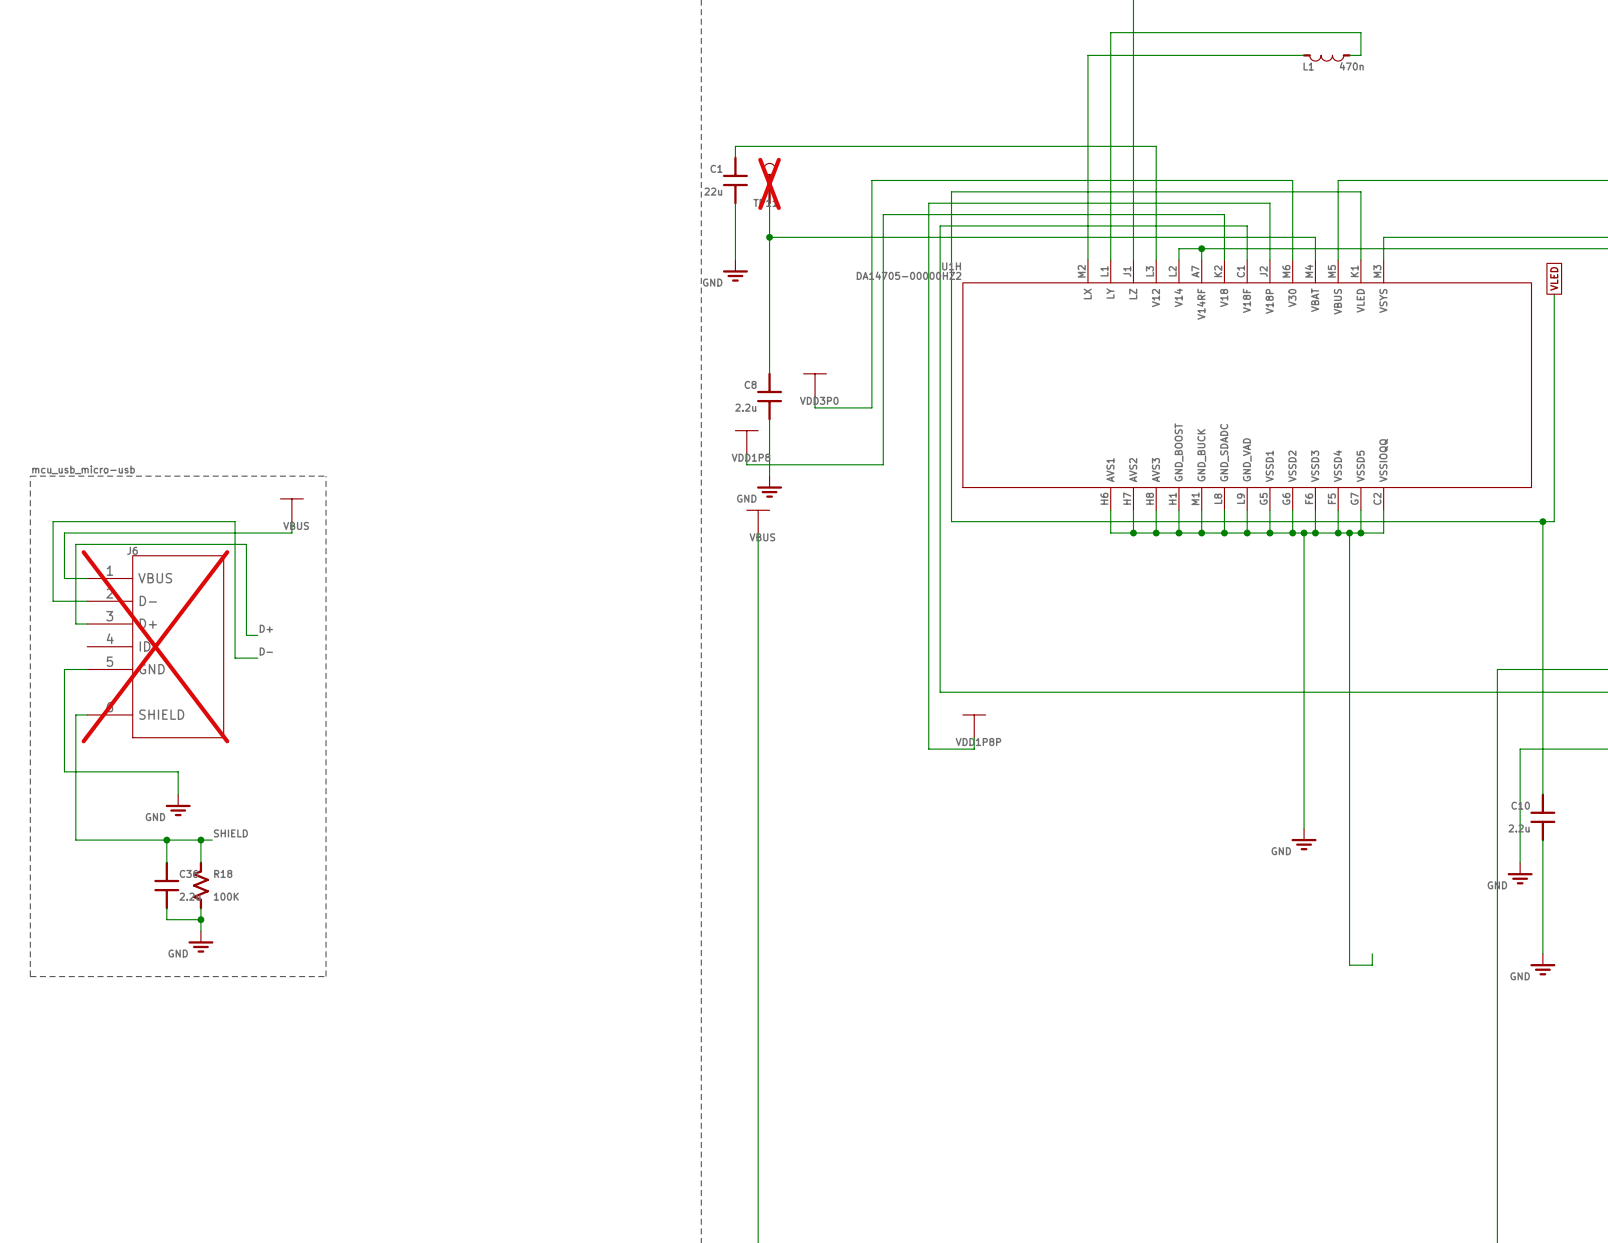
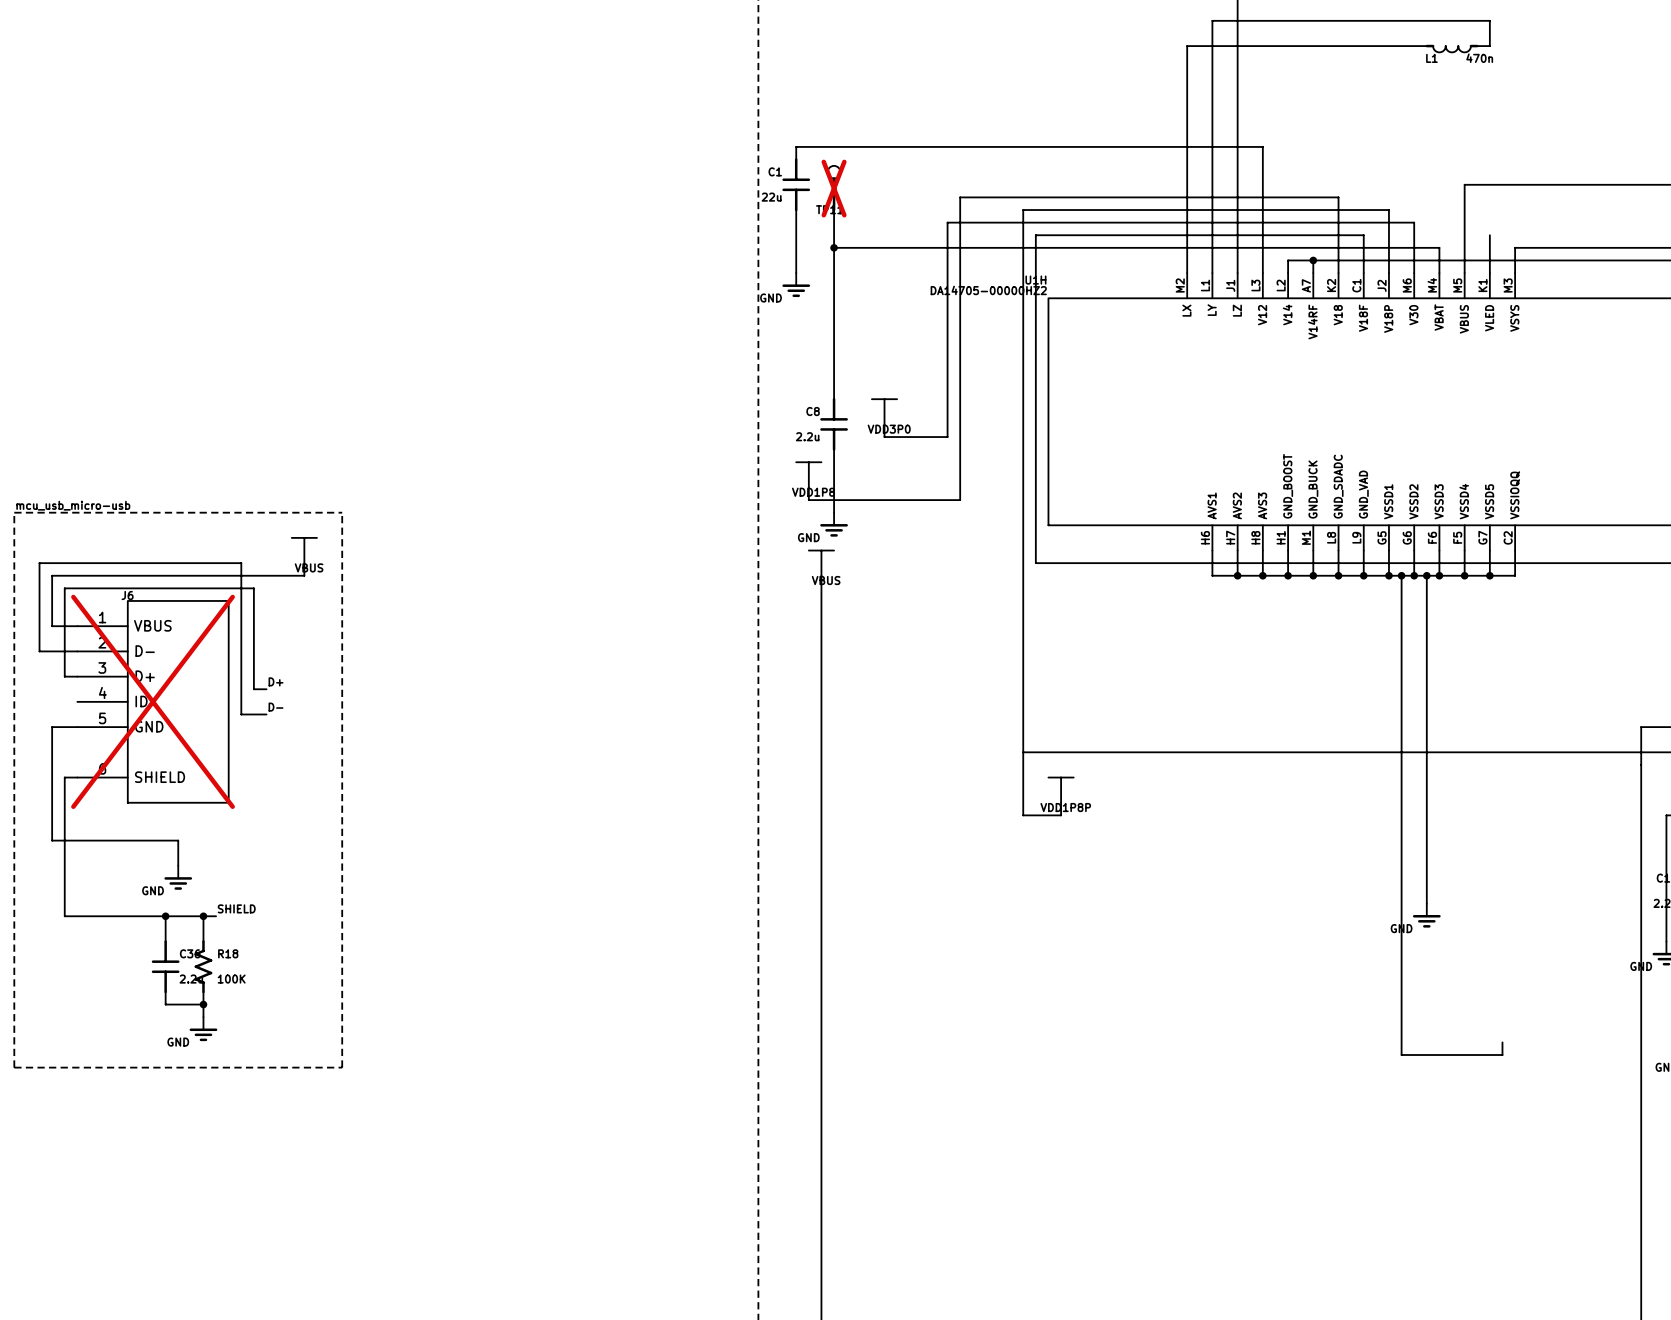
wire: (951, 191) (951, 225) (940, 225) -> (1023, 210) (1023, 235)
wire: (1224, 191) (1360, 191) (1360, 225) -> (1338, 197) (1338, 222) (1414, 222)
wire: (940, 203) (928, 203) (928, 749) (940, 749) -> (1023, 752) (1023, 815)
wire: (871, 214) (871, 180) (1292, 180) (1292, 214) -> (947, 222) (960, 222) (960, 197) (1035, 197)
junction: none -> (1401, 575)
wire: (1349, 533) (1349, 965) -> (1401, 575) (1401, 1055) (1477, 1055)
junction: (1349, 533) -> none

